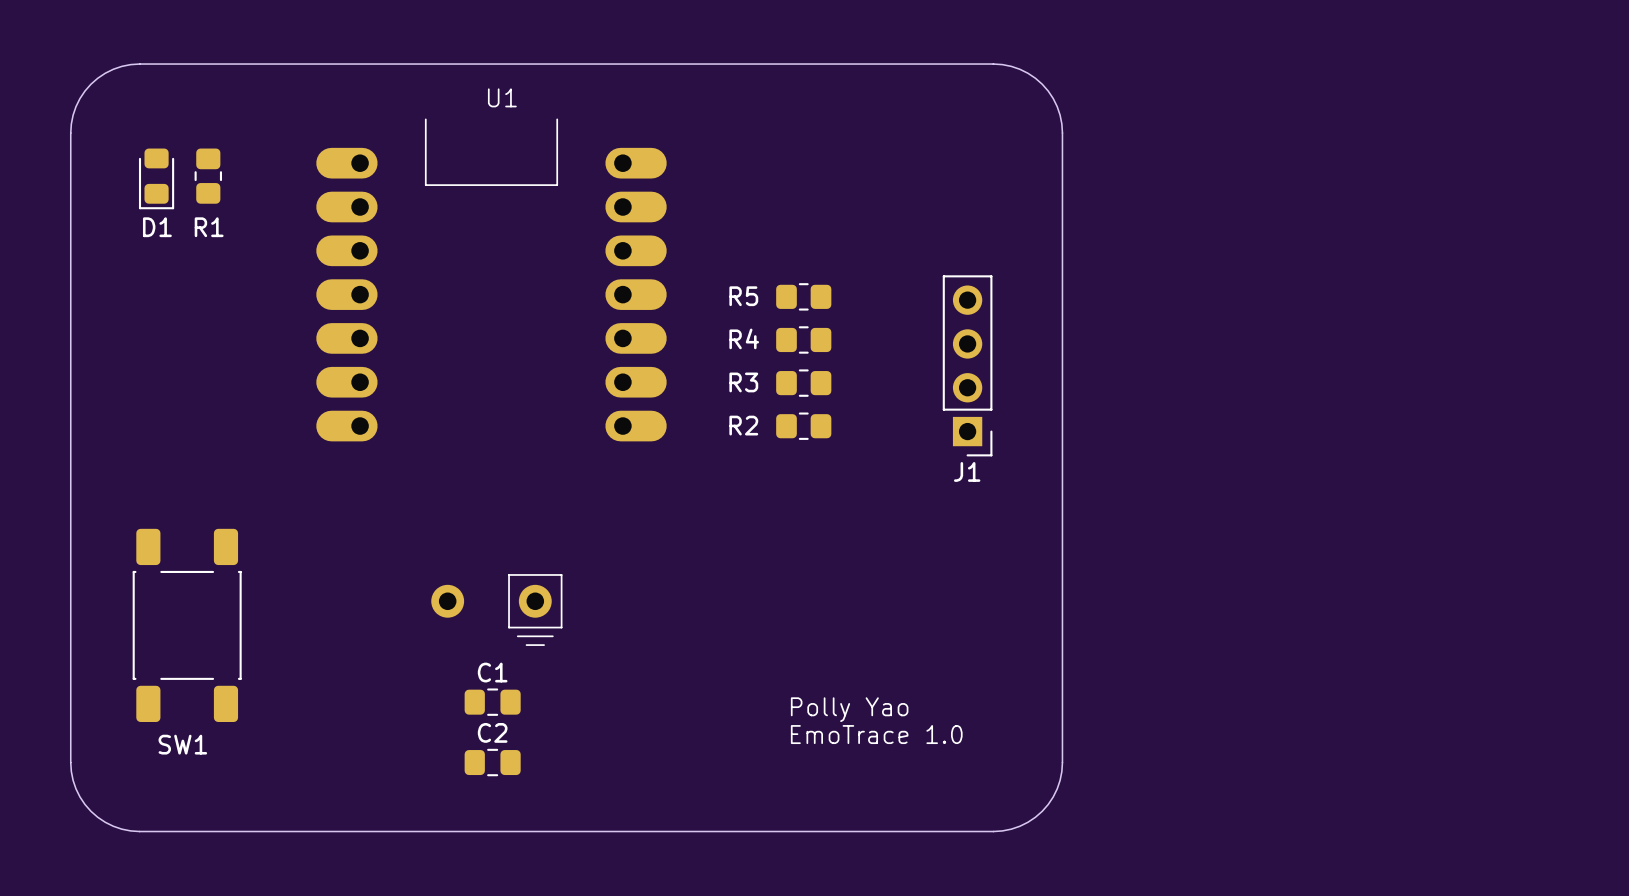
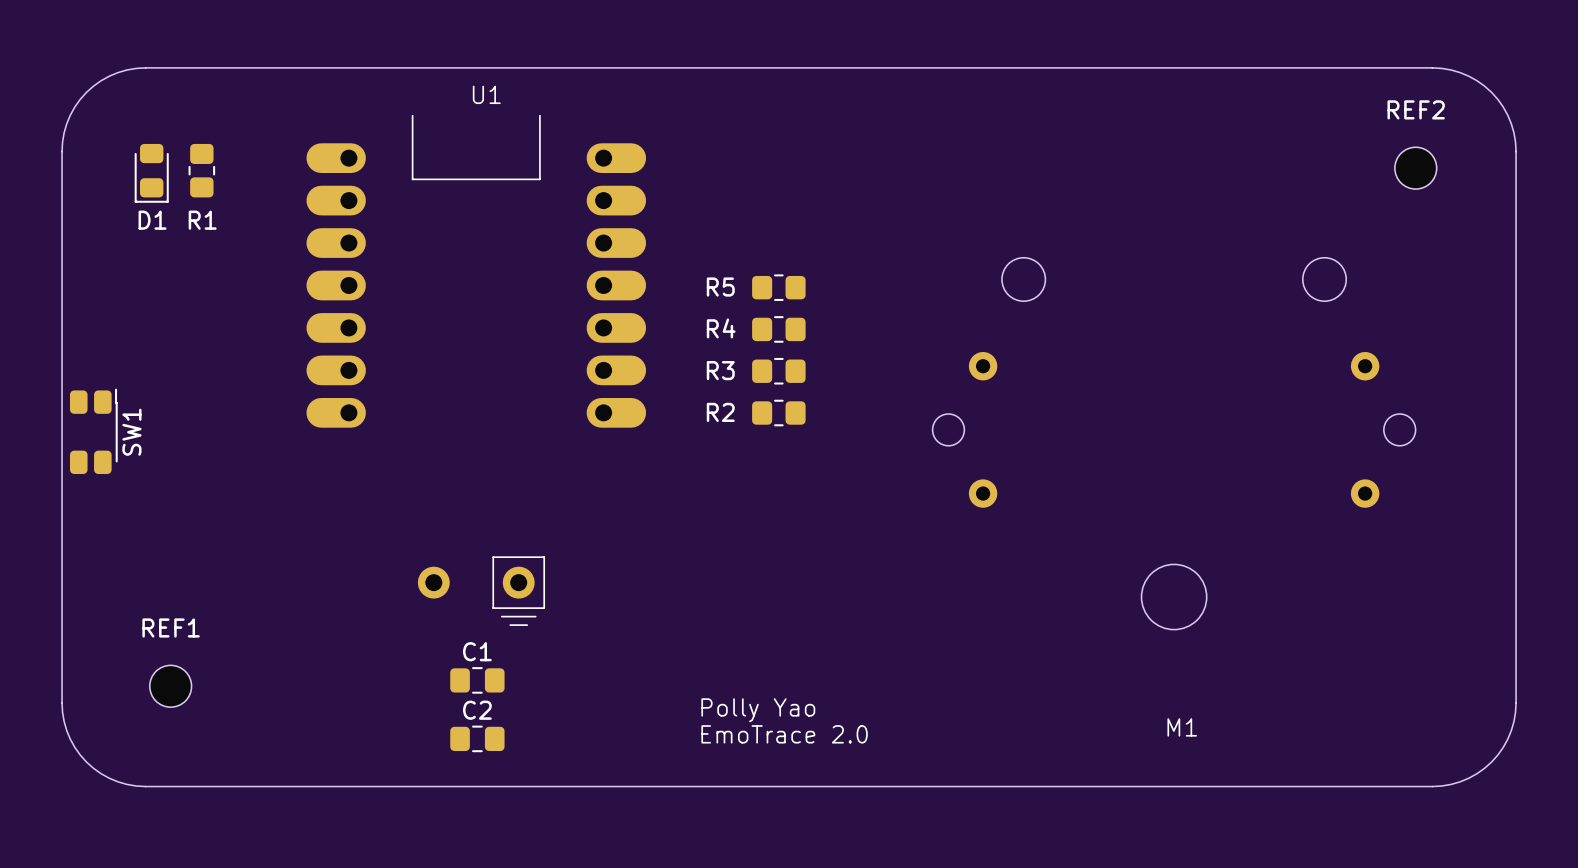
board edge: (139, 64) (993, 64) (1011, 66) (1035, 78) (1053, 98) (1060, 115) (1062, 133) (1062, 762) (1060, 780) (1048, 804) (1027, 822) (1011, 829) (993, 831) (139, 831) (121, 829) (97, 817) (79, 797) (73, 780) (70, 762) (70, 133) (76, 106) (90, 84) (113, 69) (139, 64) -> (145, 67) (118, 72) (101, 80) (86, 92) (74, 107) (66, 123) (62, 151) (62, 712) (66, 730) (80, 755) (93, 768) (109, 778) (127, 784) (145, 786) (1432, 786) (1460, 781) (1476, 773) (1497, 755) (1507, 739) (1513, 721) (1516, 702) (1515, 142) (1511, 123) (1497, 99) (1484, 86) (1468, 76) (1451, 69) (1432, 67) (145, 67)
REF2: none -> (1415, 168)
J1: (967, 365) -> none
M1: none -> (1174, 443)
SW1 footprint: [132, 528, 242, 723] -> [69, 388, 118, 475]
REF1: none -> (170, 686)
text position: Polly Yao (849, 709) -> Polly Yao (758, 710)
text: EmoTrace 1.0 (876, 734) -> EmoTrace 2.0 (784, 734)
SW1 name position: SW1 (182, 744) -> SW1 (131, 432)

